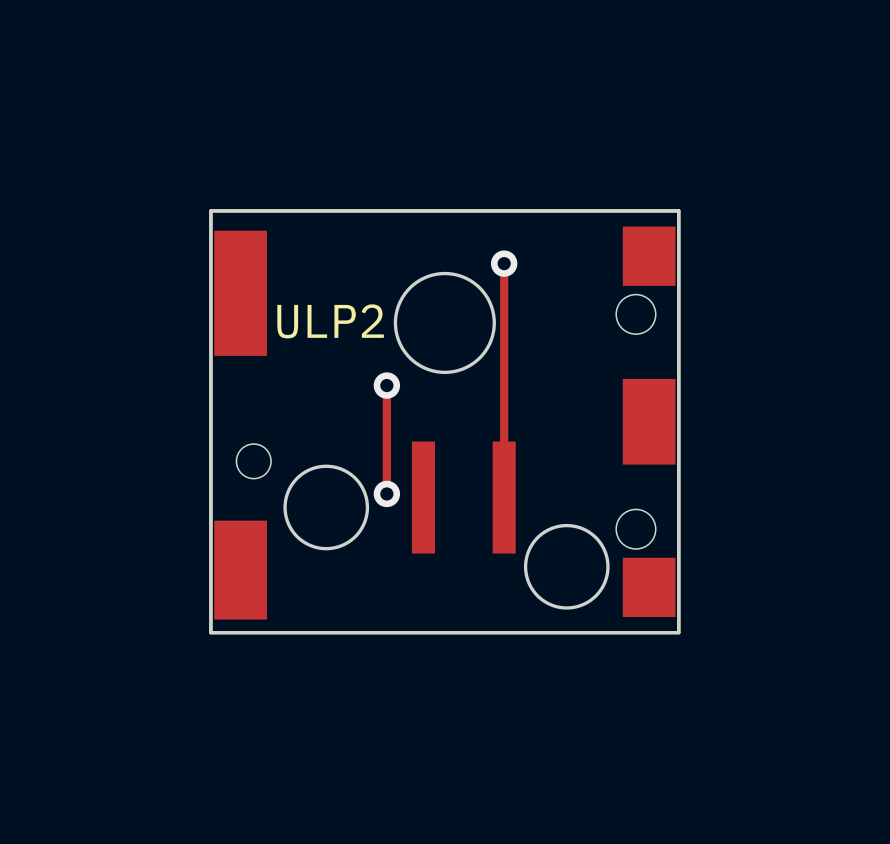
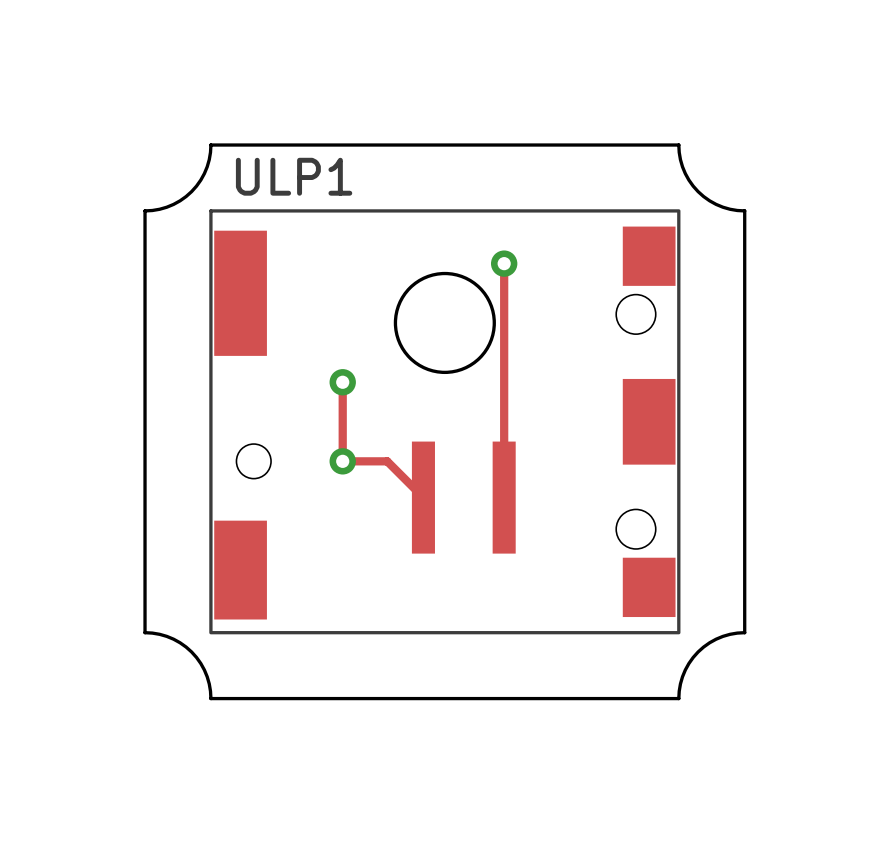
board edge: (210, 210) (210, 632) (678, 632) (678, 210) (210, 210) -> (210, 145) (209, 159) (204, 173) (191, 191) (173, 204) (159, 209) (145, 210) (145, 632) (166, 636) (180, 642) (191, 651) (200, 663) (207, 676) (210, 698) (678, 698) (680, 683) (685, 669) (698, 651) (716, 639) (730, 634) (744, 632) (744, 210) (730, 209) (716, 204) (698, 191) (685, 173) (680, 159) (678, 145) (210, 145)
ULP2 name: ULP2 (330, 321) -> ULP1 (294, 176)
track: none -> (342, 382) (342, 461) (387, 461) (423, 497)
via: none -> (342, 382)
track: (386, 385) (386, 493) -> none
via: (386, 385) -> none
via: none -> (342, 461)
round board edge: [283, 464, 370, 551] -> none
via: (386, 493) -> none
round board edge: [523, 523, 610, 610] -> none

